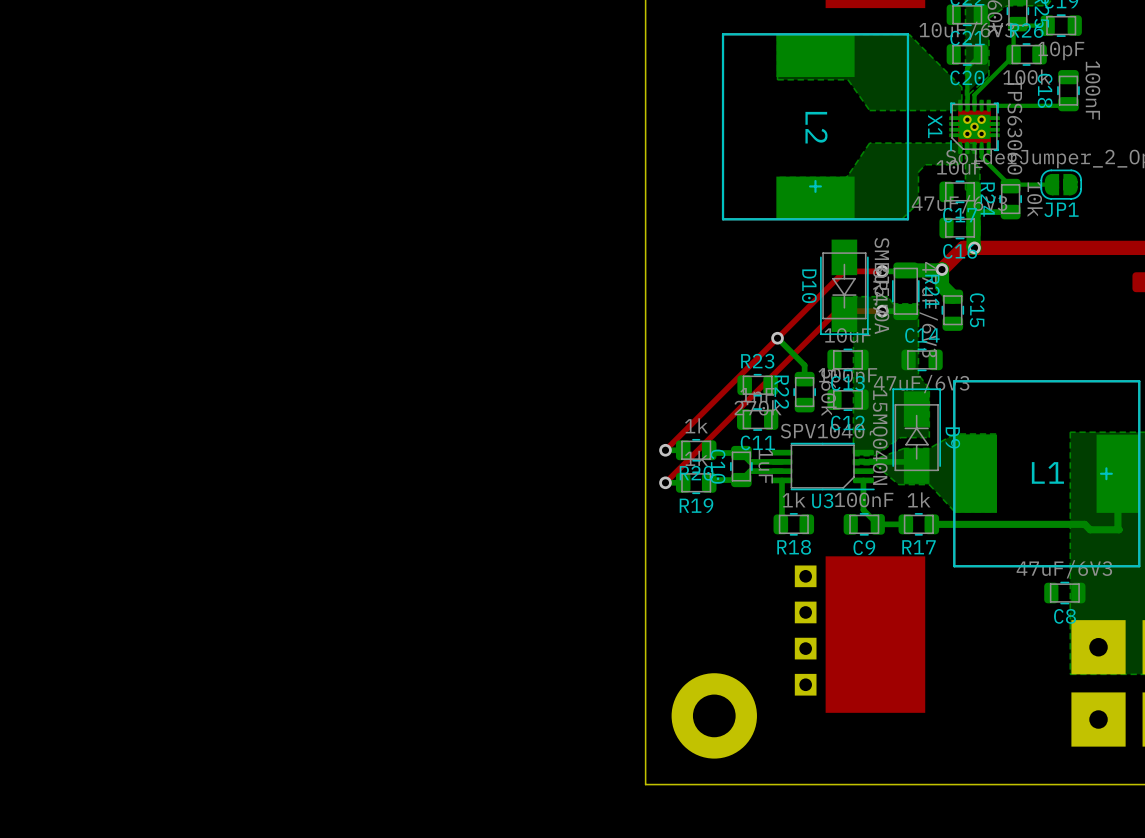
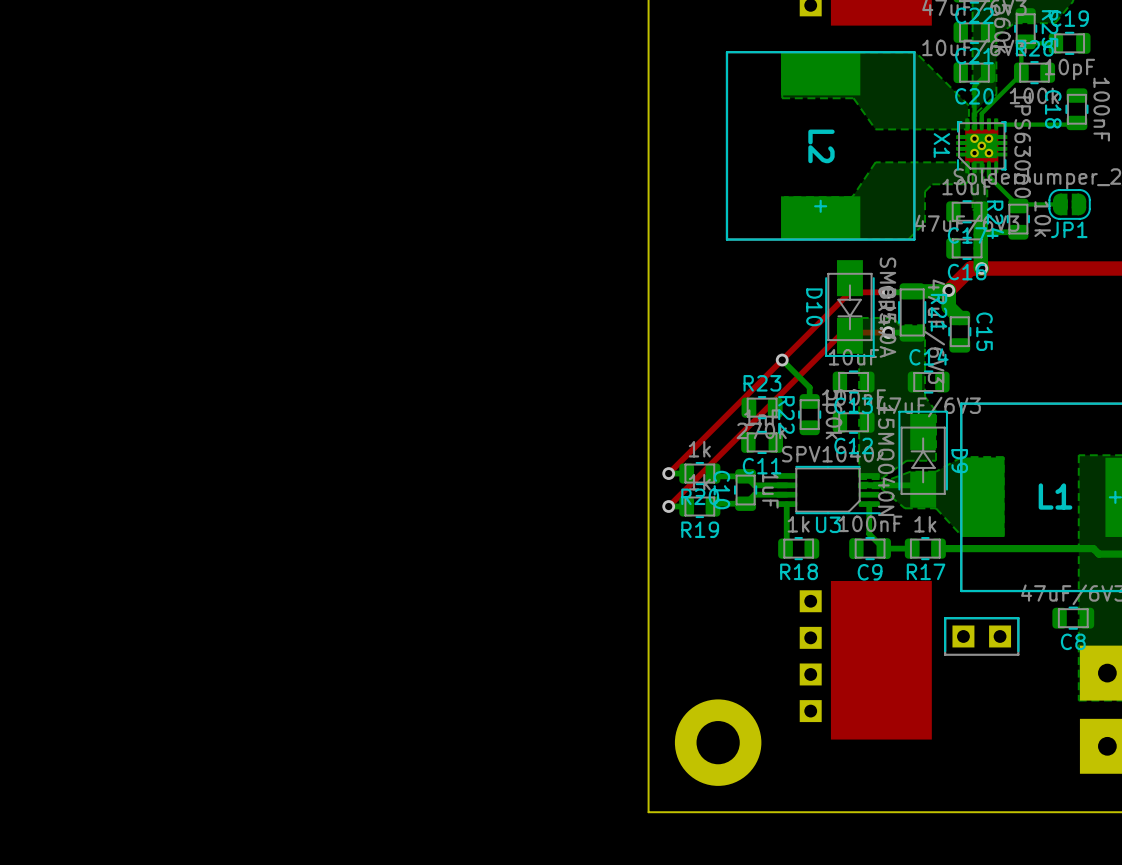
part: none -> (981, 636)

